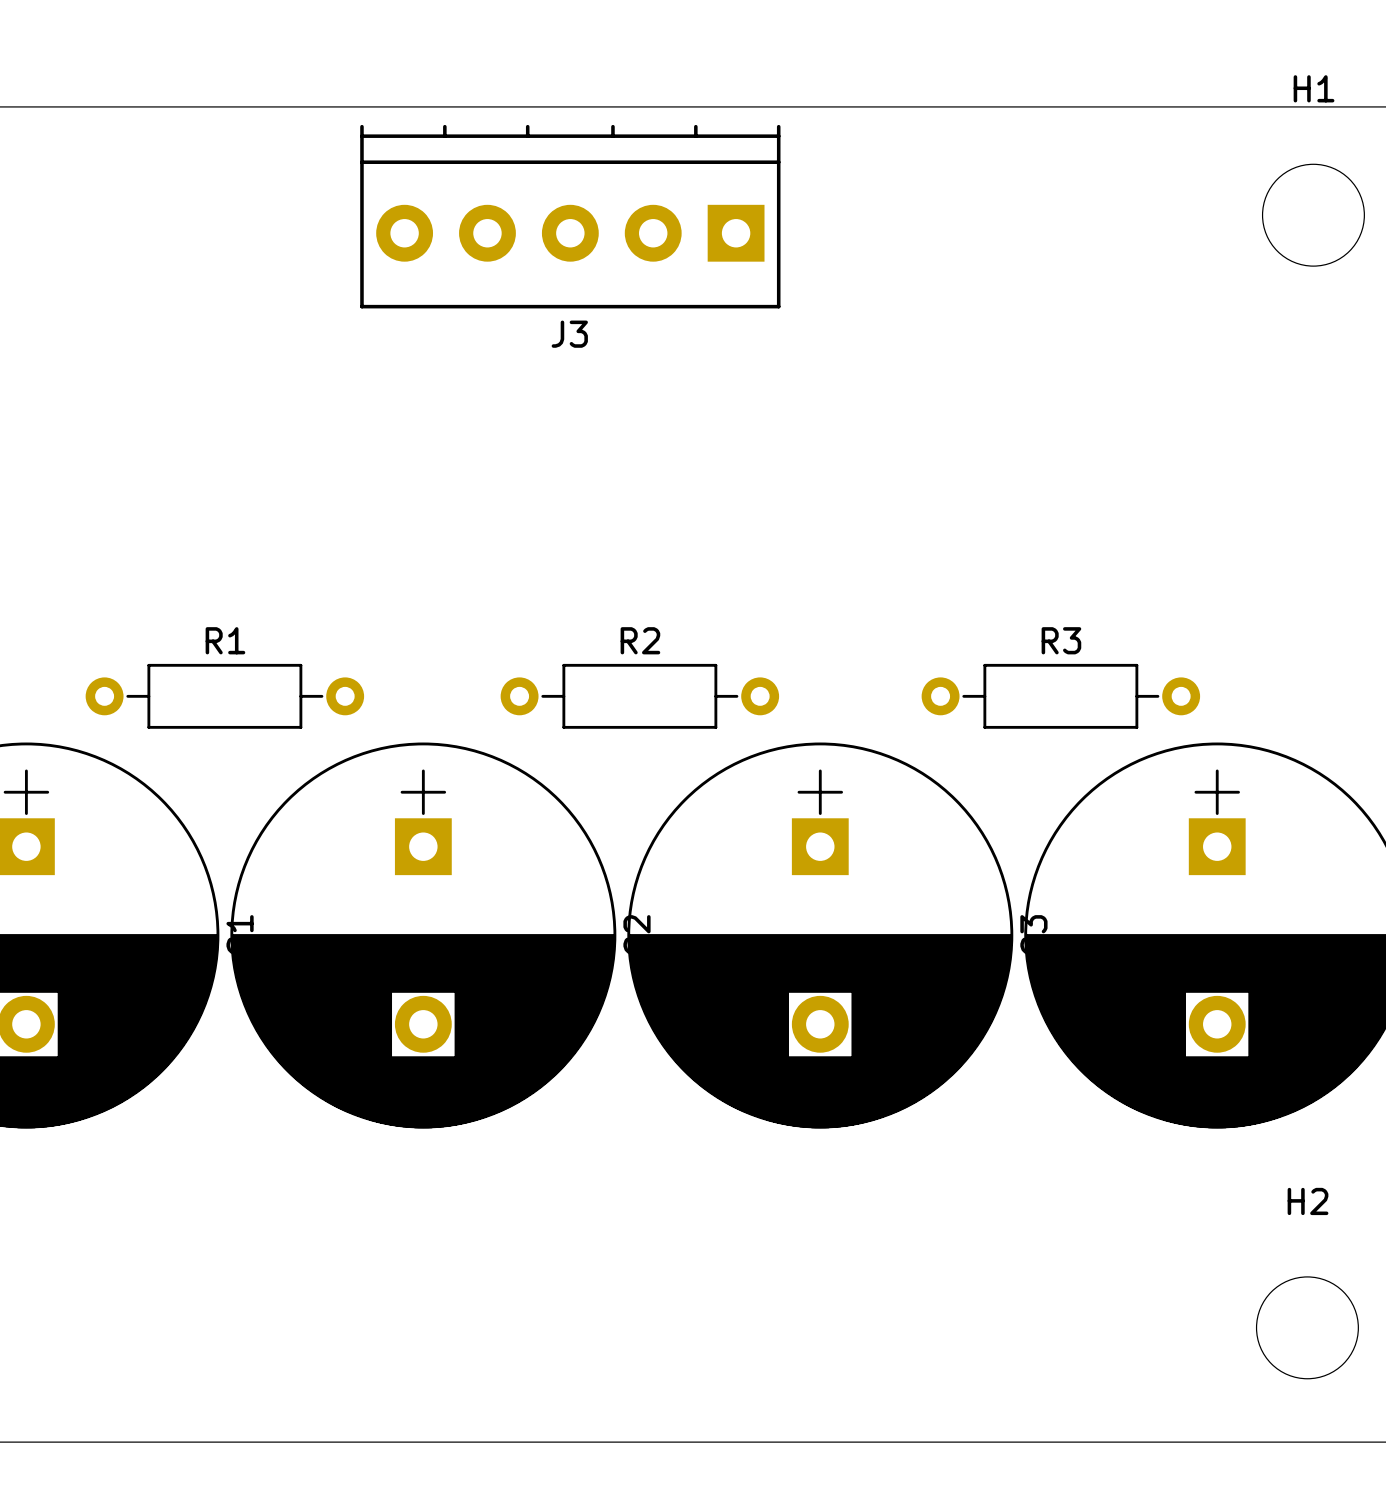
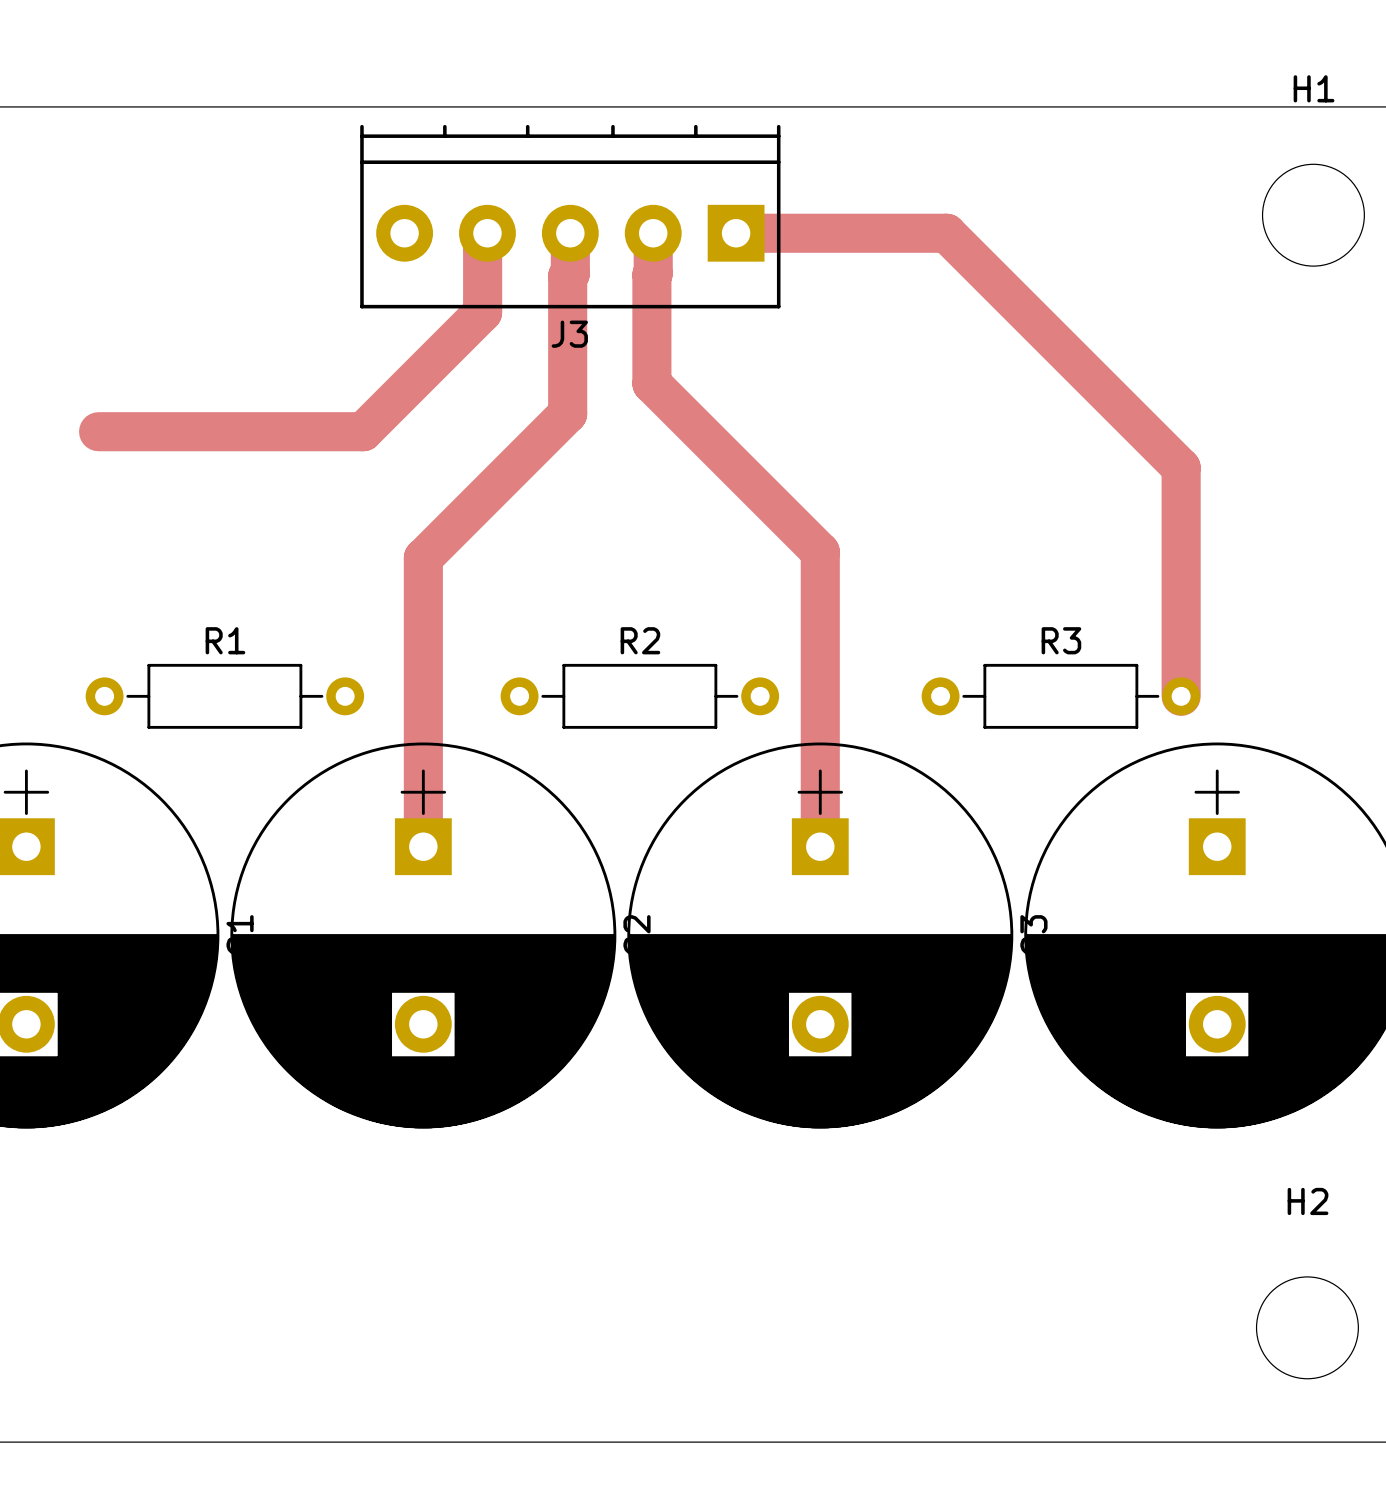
track: none -> (487, 233) (487, 241) (482, 246) (482, 312) (363, 431) (98, 431)
track: none -> (570, 233) (570, 273) (567, 276) (567, 413) (423, 558) (423, 846)
track: none -> (653, 233) (651, 383) (820, 552) (820, 846)
track: none -> (736, 233) (946, 233) (1181, 467) (1181, 696)

